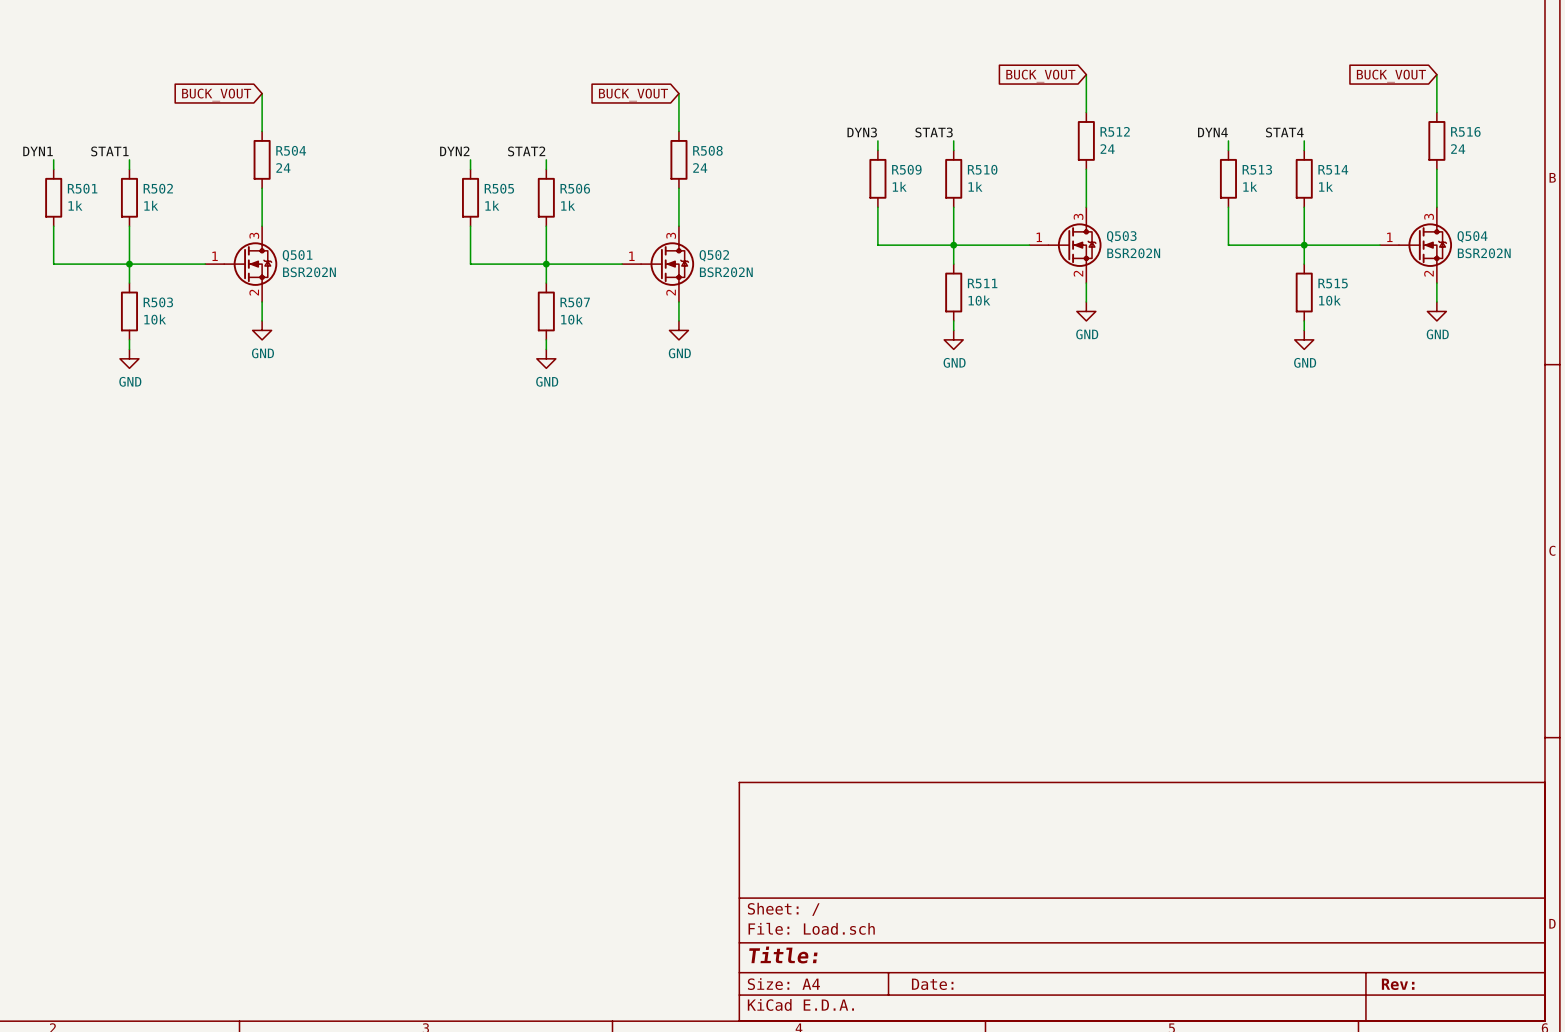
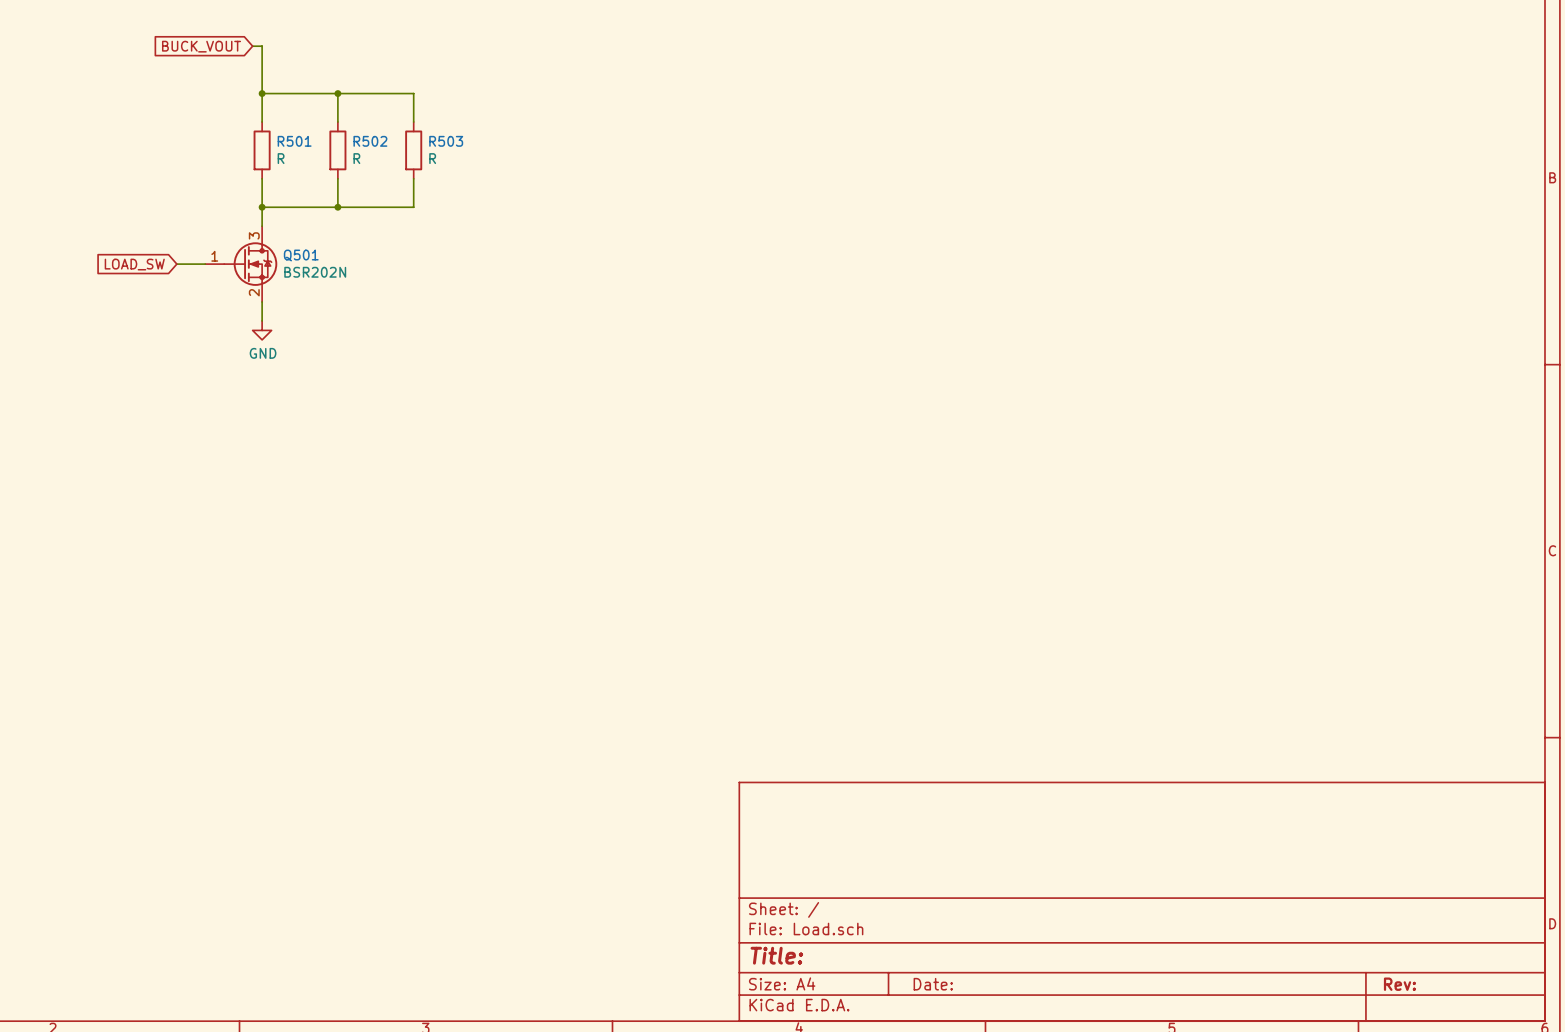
wire: none -> (252, 46) (262, 46) (262, 93) (413, 93) (413, 121)
wire: (1086, 74) (1086, 112) -> none
wire: (1436, 74) (1436, 112) -> none
global label: BUCK_VOUT (1040, 76) -> none
global label: BUCK_VOUT (1391, 76) -> none
junction: none -> (262, 93)
wire: none -> (337, 93) (337, 121)
junction: none -> (337, 93)
wire: (678, 93) (678, 131) -> none
global label position: BUCK_VOUT (216, 95) -> BUCK_VOUT (201, 46)
global label: BUCK_VOUT (633, 95) -> none
label: DYN3 (862, 132) -> none
label: STAT3 (934, 132) -> none
label: DYN4 (1212, 132) -> none
label: STAT4 (1284, 132) -> none
wire: (877, 140) (877, 150) -> none
wire: (953, 140) (953, 150) -> none
R512: 24 (1086, 140) -> none
wire: (1228, 140) (1228, 150) -> none
wire: (1304, 140) (1304, 150) -> none
R516: 24 (1436, 140) -> none
label: DYN1 (38, 151) -> none
label: STAT1 (109, 151) -> none
label: DYN2 (454, 151) -> none
label: STAT2 (526, 151) -> none
wire: (53, 159) (53, 169) -> none
wire: (129, 159) (129, 169) -> none
R504: 24 (262, 159) -> none
wire: (470, 159) (470, 169) -> none
wire: (546, 159) (546, 169) -> none
R508: 24 (678, 159) -> none
wire: (1086, 169) (1086, 207) -> none
wire: (1436, 169) (1436, 207) -> none
wire: none -> (337, 178) (337, 207)
wire: none -> (413, 178) (413, 207) (262, 207)
R509: 1k (877, 178) -> none
R510: 1k (953, 178) -> none
R513: 1k (1228, 178) -> none
R514: 1k (1304, 178) -> none
wire: (678, 188) (678, 226) -> none
R501 position: (53, 197) -> (262, 150)
R502 position: (129, 197) -> (337, 150)
R505: 1k (470, 197) -> none
R506: 1k (546, 197) -> none
R501 value: 1k (75, 205) -> R (281, 158)
R502 value: 1k (151, 205) -> R (356, 158)
junction: none -> (262, 207)
junction: none -> (337, 207)
wire: (877, 207) (877, 245) (1029, 245) -> none
wire: (953, 207) (953, 264) -> none
wire: (1228, 207) (1228, 245) (1380, 245) -> none
wire: (1304, 207) (1304, 264) -> none
wire: (53, 226) (53, 264) (176, 264) -> none
wire: (129, 226) (129, 283) -> none
wire: (470, 226) (470, 264) (622, 264) -> none
wire: (546, 226) (546, 283) -> none
junction: (953, 245) -> none
Q503: BSR202N (1065, 245) -> none
junction: (1304, 245) -> none
Q504: BSR202N (1416, 245) -> none
junction: (129, 264) -> none
junction: (546, 264) -> none
Q502: BSR202N (658, 264) -> none
global label: none -> LOAD_SW (134, 264)
wire: (1086, 283) (1086, 301) -> none
wire: (1436, 283) (1436, 301) -> none
R511: 10k (953, 292) -> none
R515: 10k (1304, 292) -> none
wire: (678, 301) (678, 320) -> none
R503 position: (129, 311) -> (413, 150)
R507: 10k (546, 311) -> none
power symbol: GND (1086, 311) -> none
power symbol: GND (1436, 311) -> none
R503 value: 10k (155, 319) -> R (432, 158)
wire: (953, 320) (953, 330) -> none
wire: (1304, 320) (1304, 330) -> none
power symbol: GND (678, 330) -> none
wire: (129, 339) (129, 349) -> none
wire: (546, 339) (546, 349) -> none
power symbol: GND (953, 339) -> none
power symbol: GND (1304, 339) -> none
power symbol: GND (129, 358) -> none
power symbol: GND (546, 358) -> none

